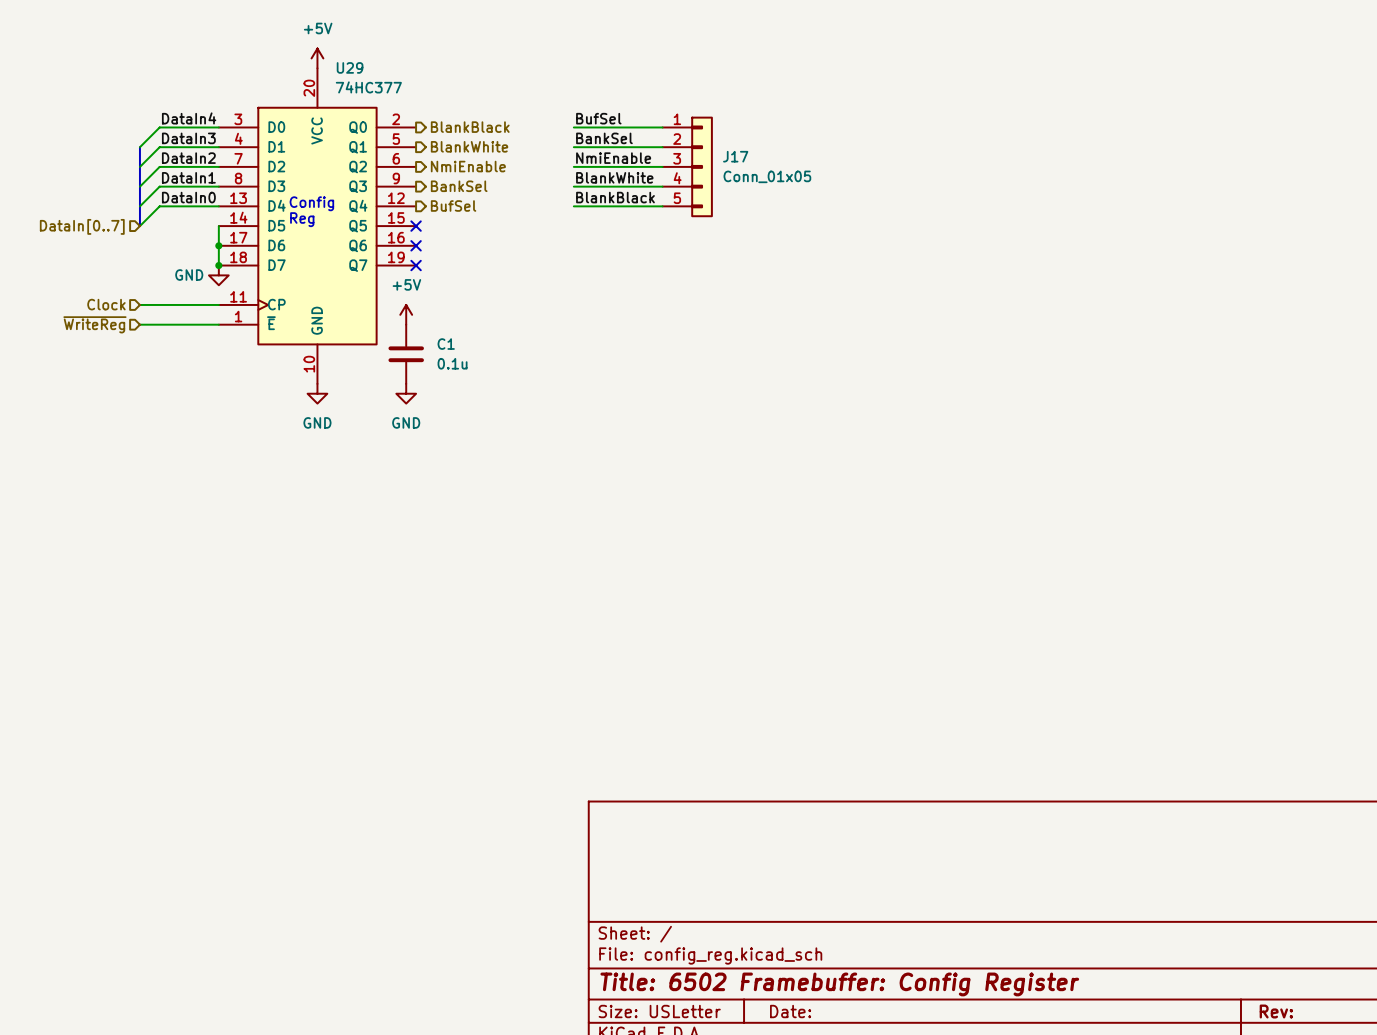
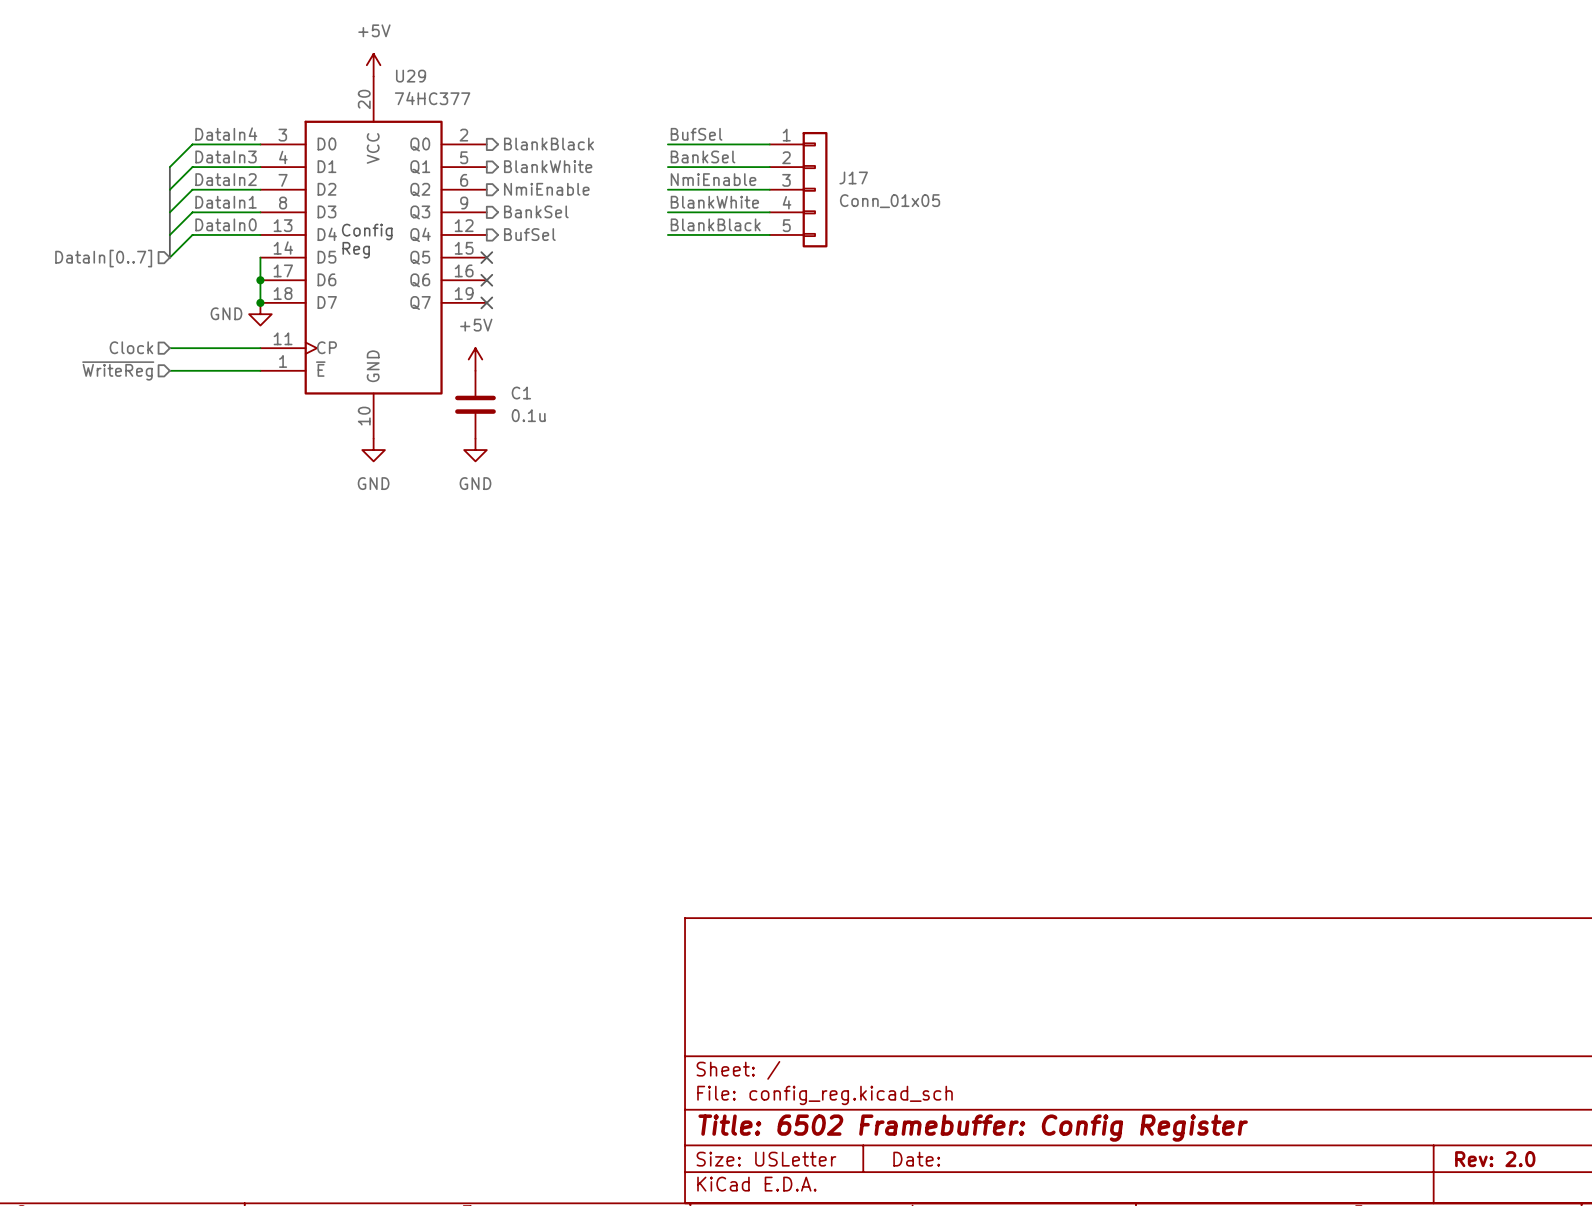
title block: Rev: (1276, 1011) -> Rev: 2.0 (1495, 1159)

